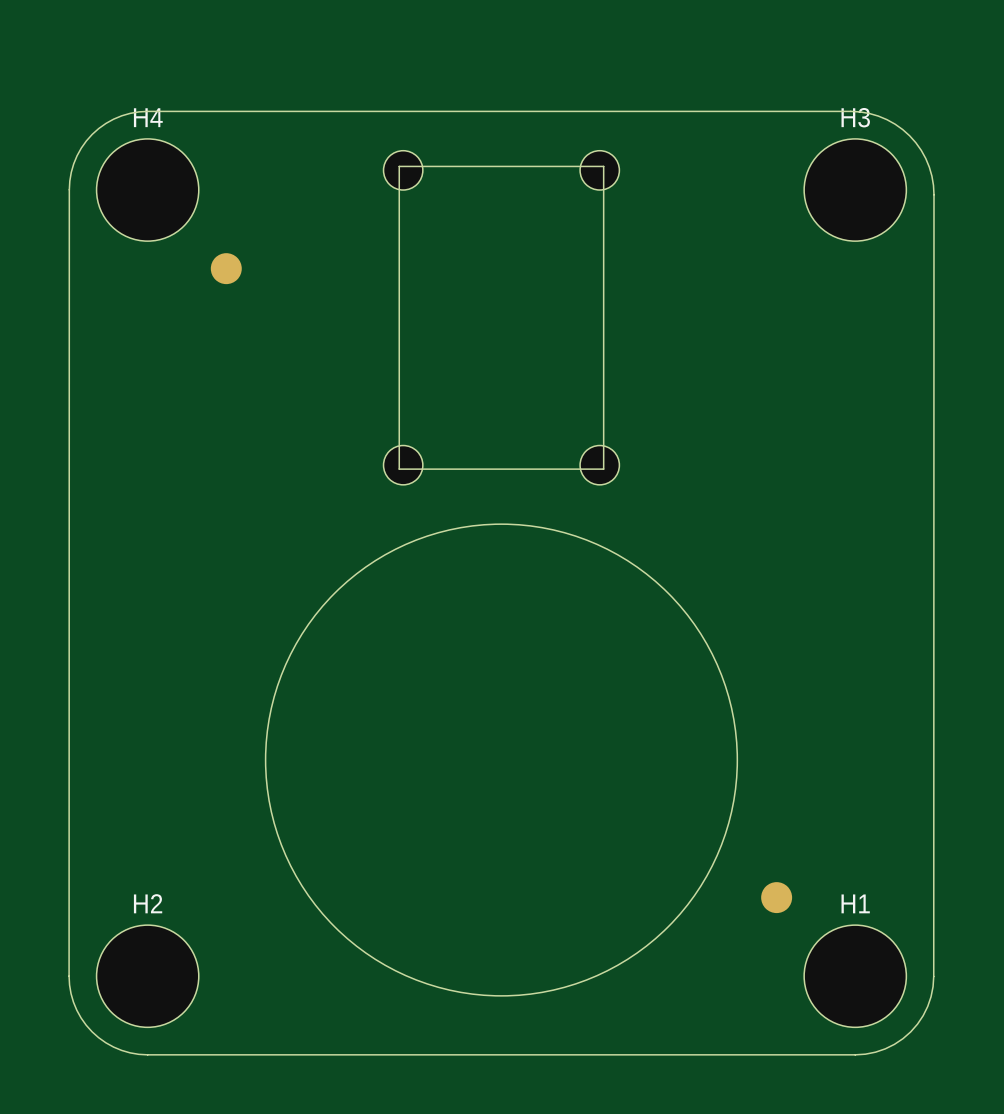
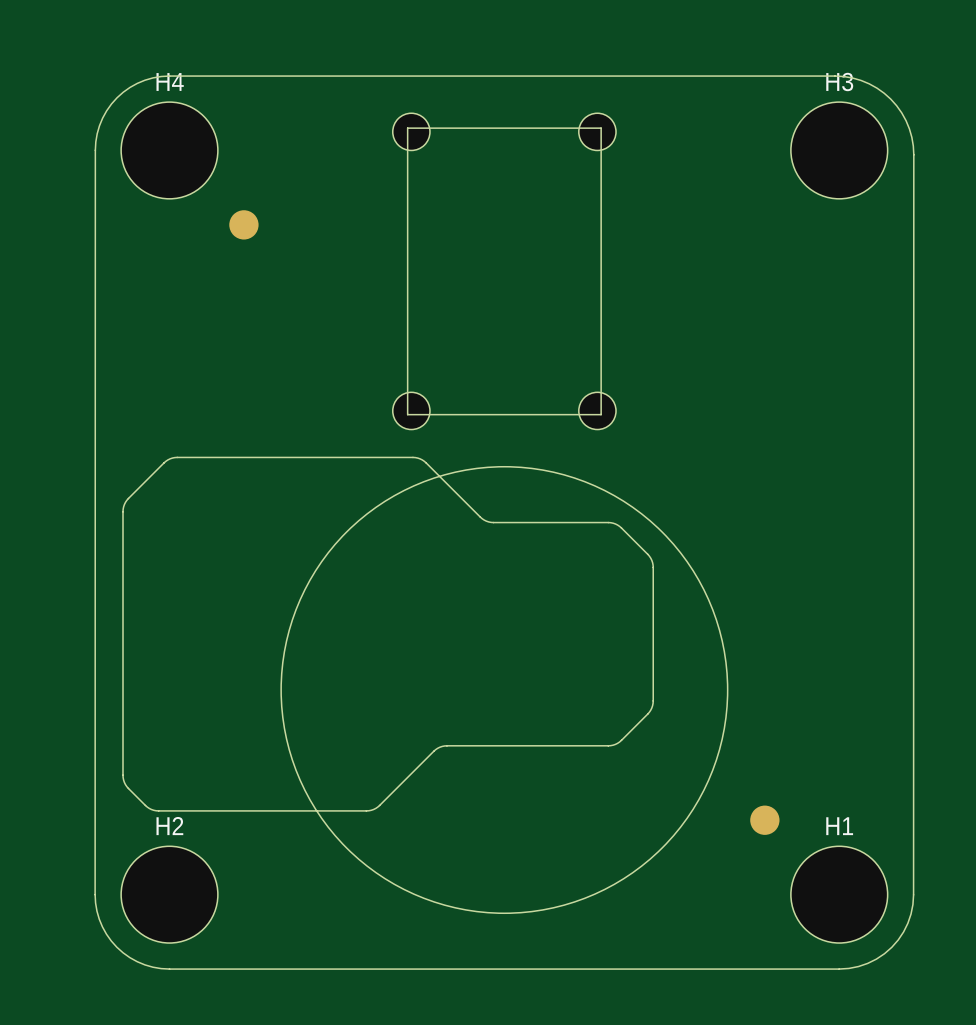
board edge: none -> (177, 457) (415, 457) (426, 462) (480, 517) (488, 521) (608, 522) (617, 525) (647, 554) (653, 565) (653, 700) (650, 710) (621, 740) (610, 745) (439, 747) (379, 805) (368, 810) (158, 810) (149, 808) (126, 786) (123, 777) (123, 509) (128, 498) (164, 462) (177, 457)

